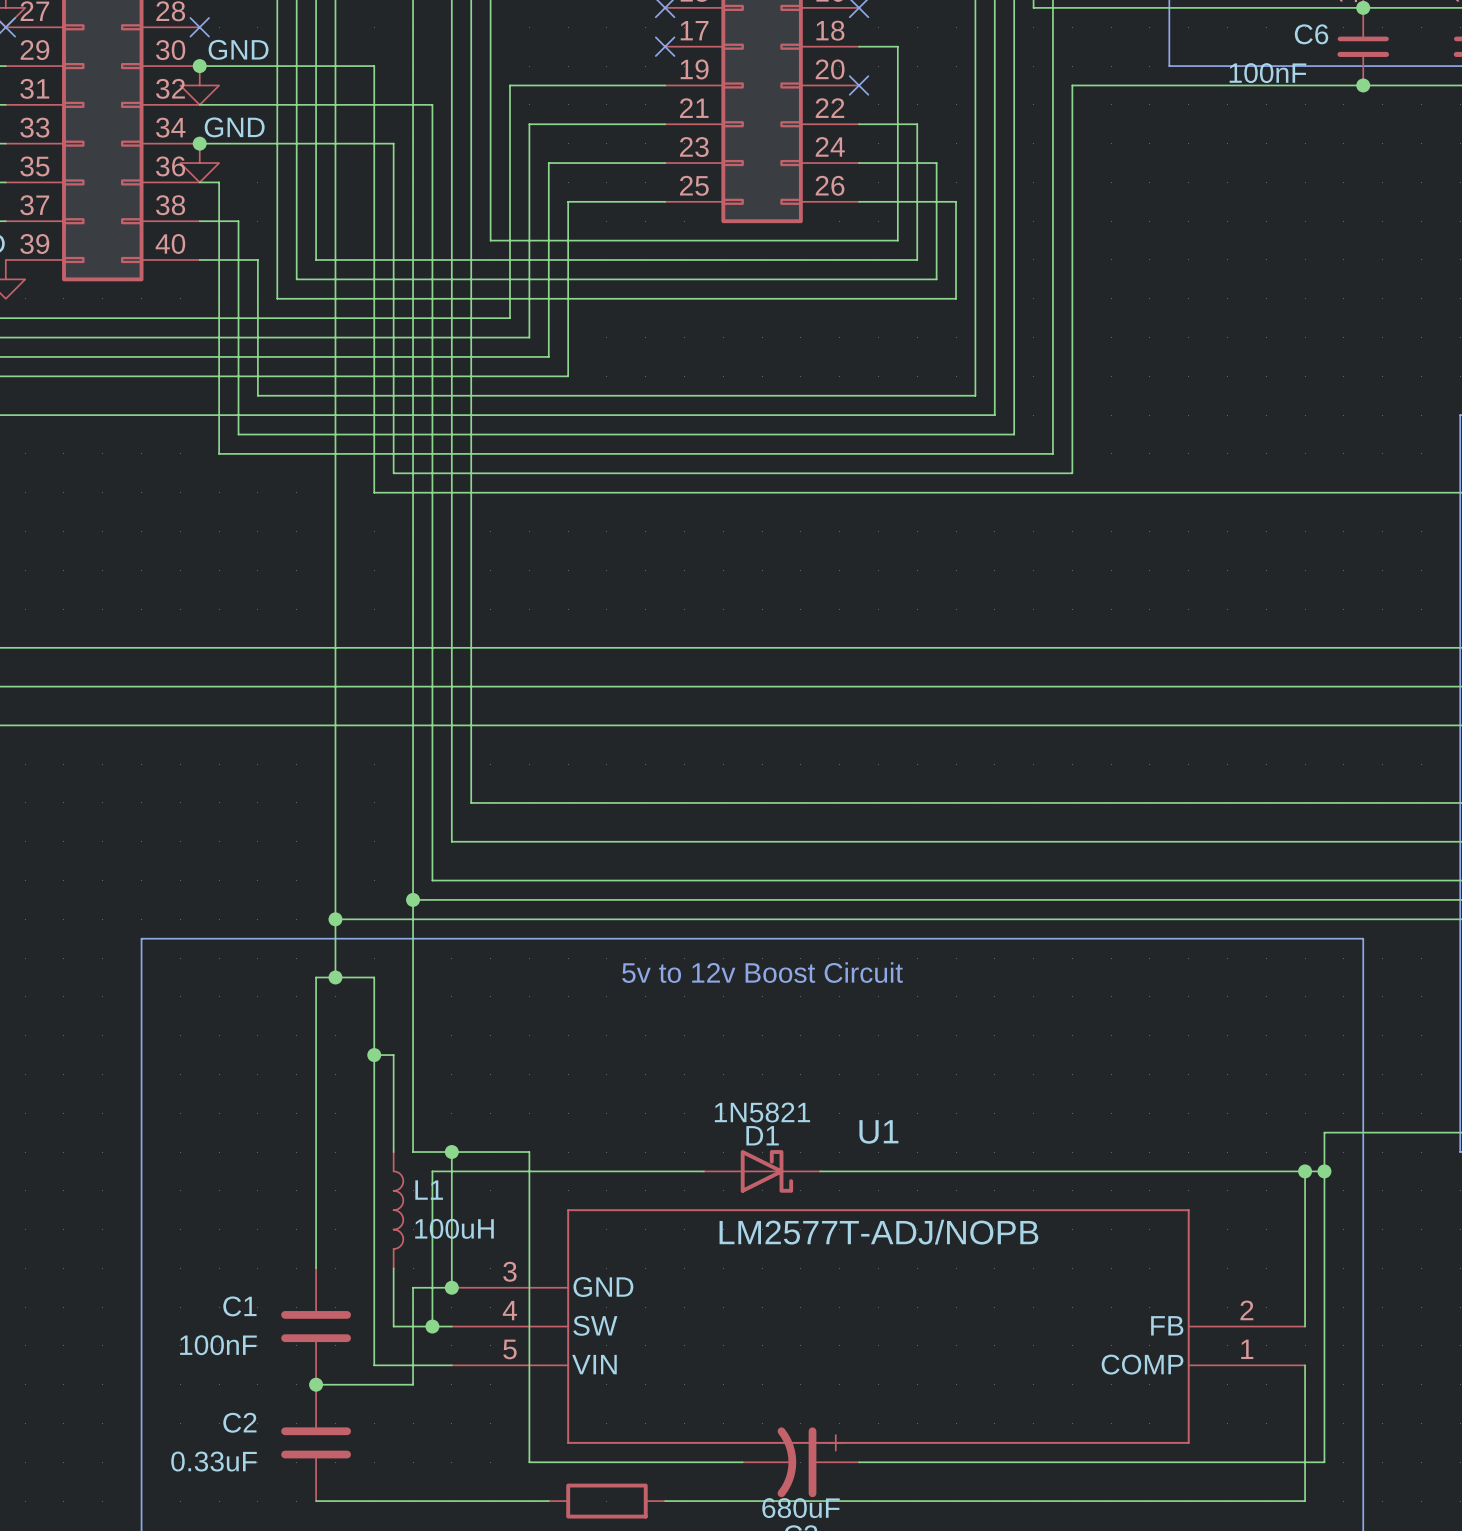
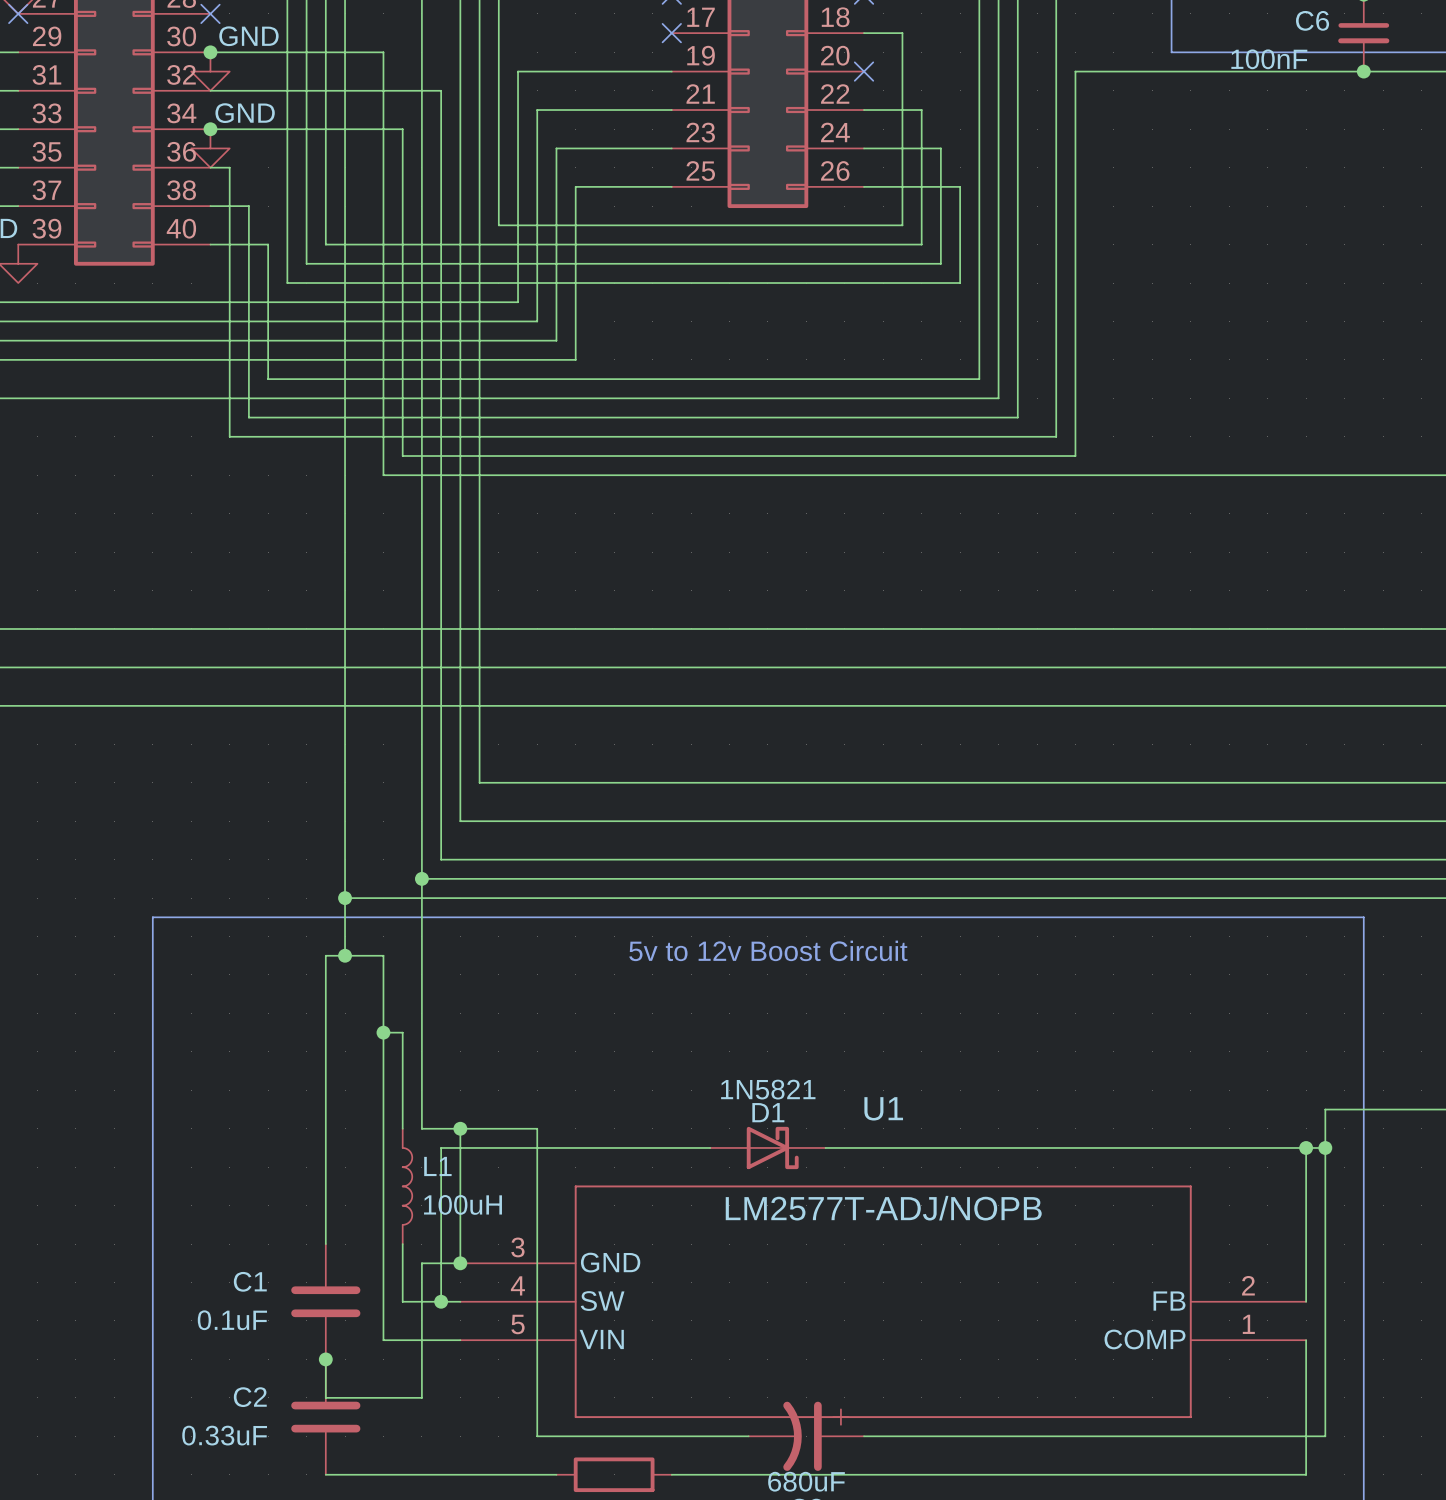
C1 value: 100nF (218, 1345) -> 0.1uF (232, 1320)
wire: (316, 1384) (413, 1384) -> (325, 1359) (325, 1397) (421, 1397) (421, 1359)

